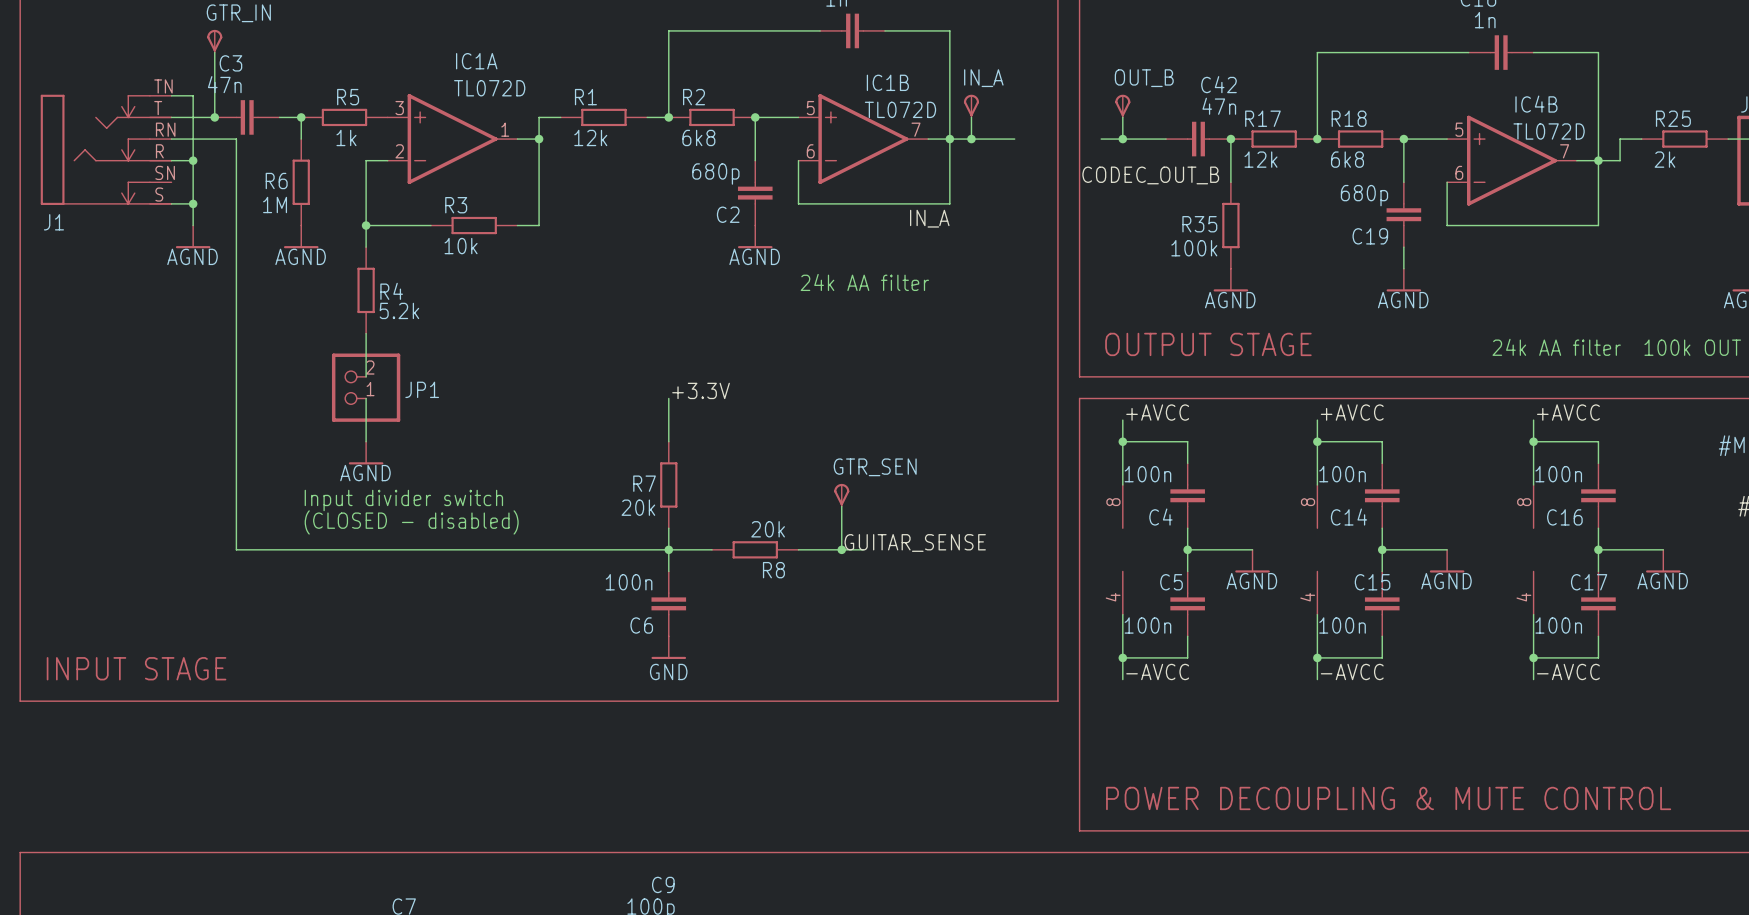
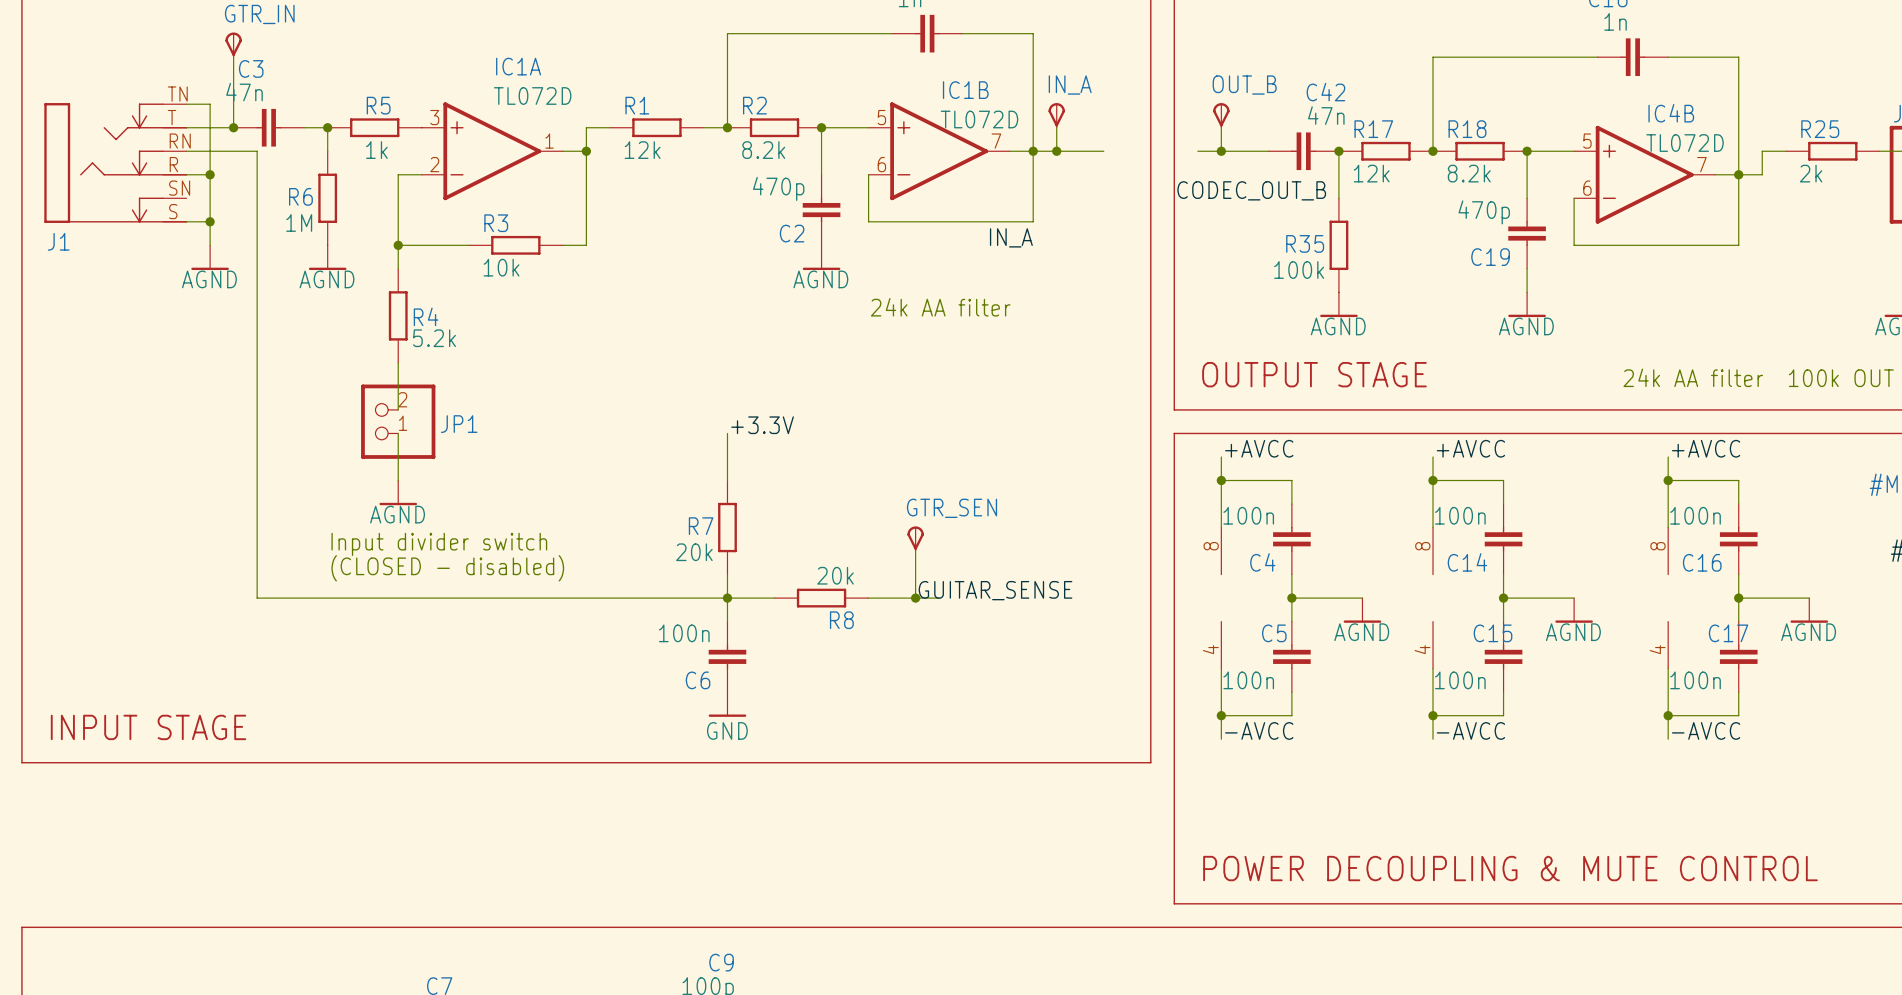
R2 value: 6k8 (698, 137) -> 8.2k (763, 150)
R18 value: 6k8 (1347, 159) -> 8.2k (1469, 173)
C2 value: 680p (715, 174) -> 470p (778, 188)
C19 value: 680p (1364, 195) -> 470p (1484, 212)

